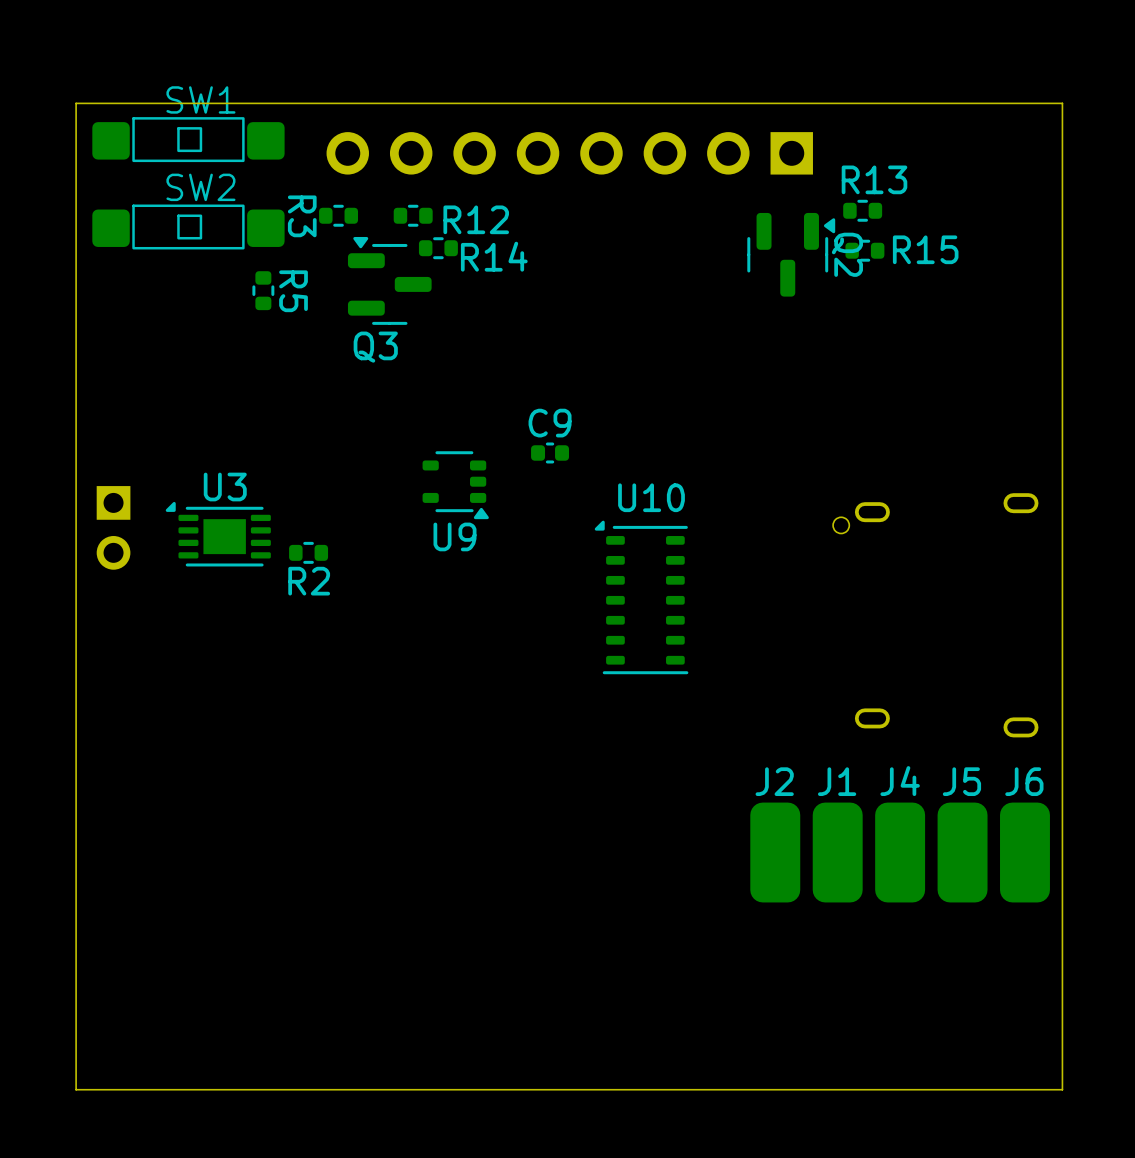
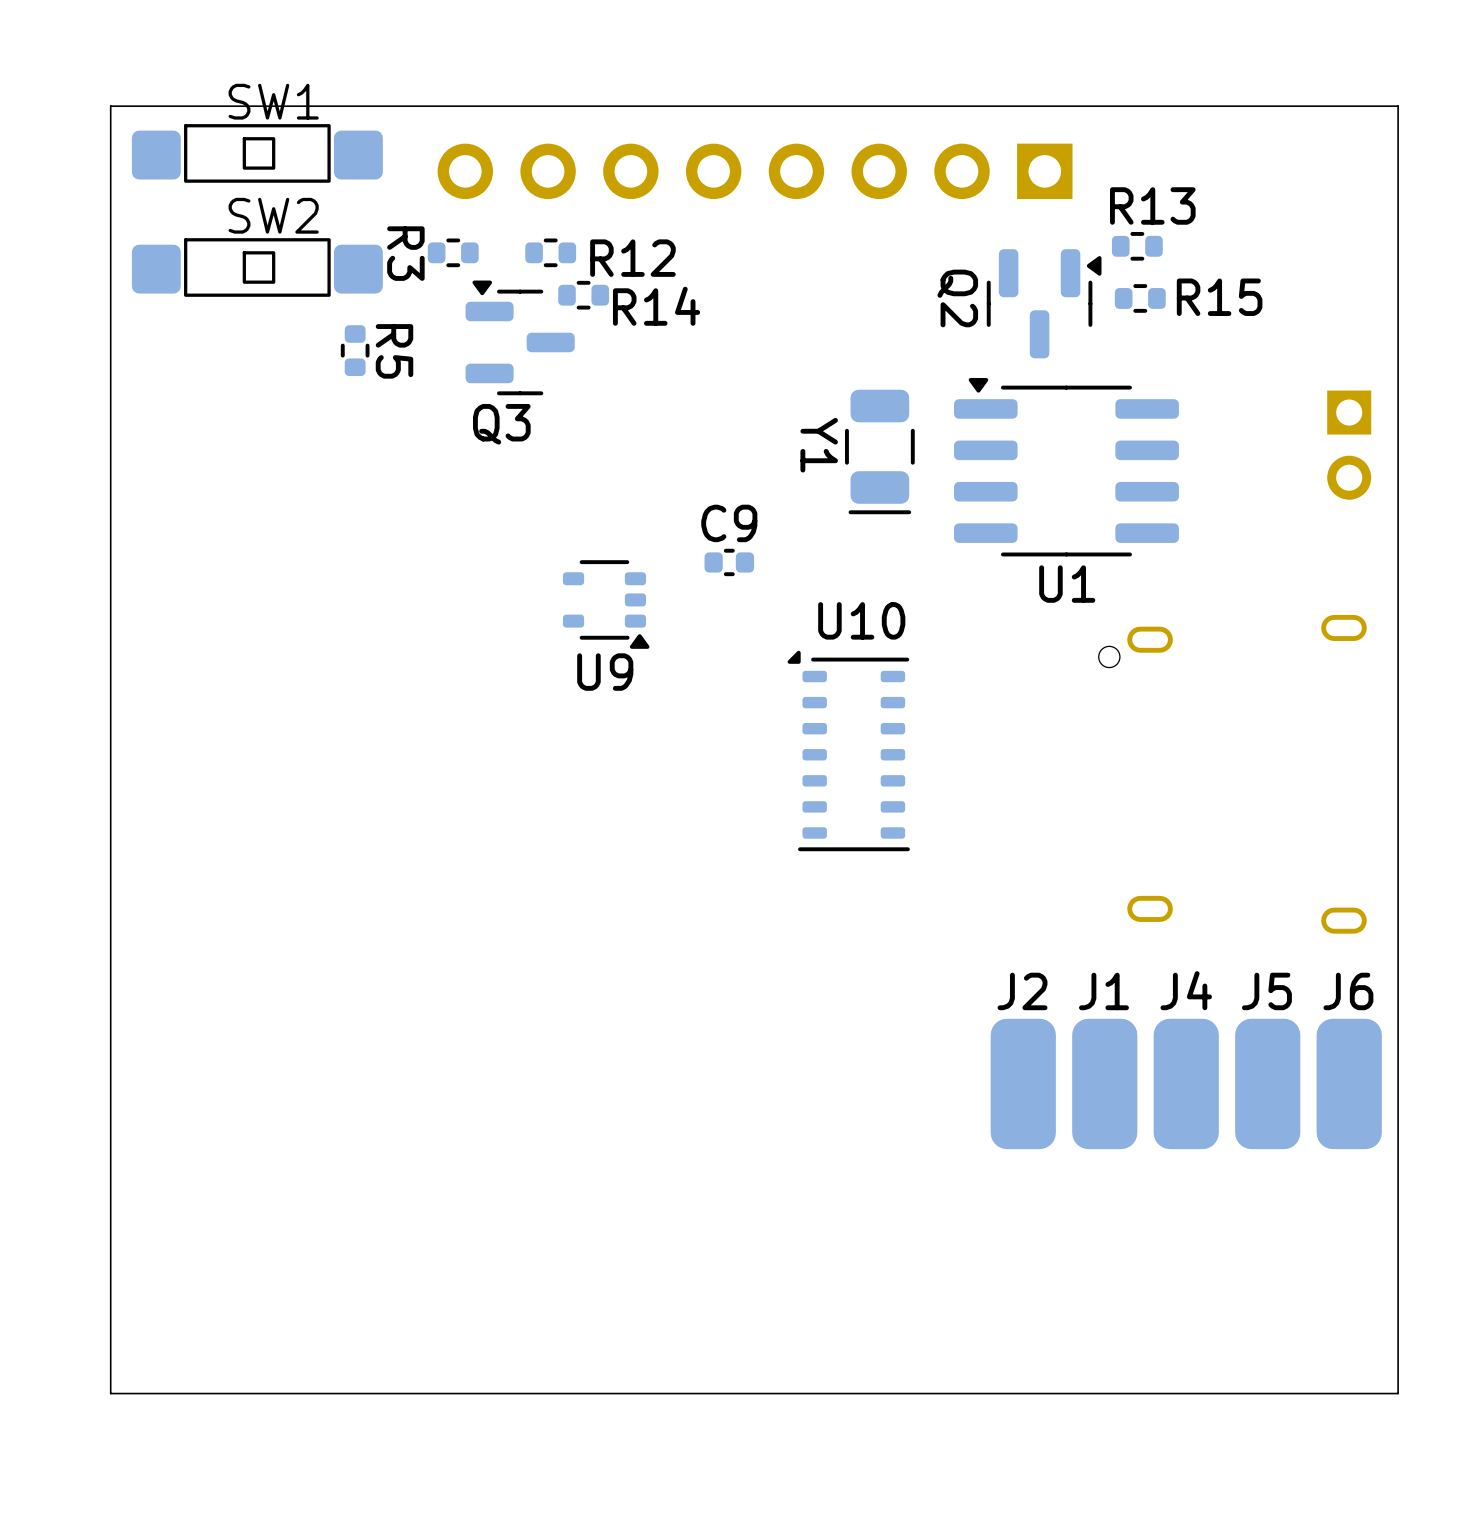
Q2 name position: Q2 (847, 254) -> Q2 (957, 298)
part: none -> (1349, 445)
Y1: none -> (879, 451)
U1: none -> (1066, 467)
part: (113, 527) -> none
U3: (218, 534) -> none
R2: (308, 552) -> none

